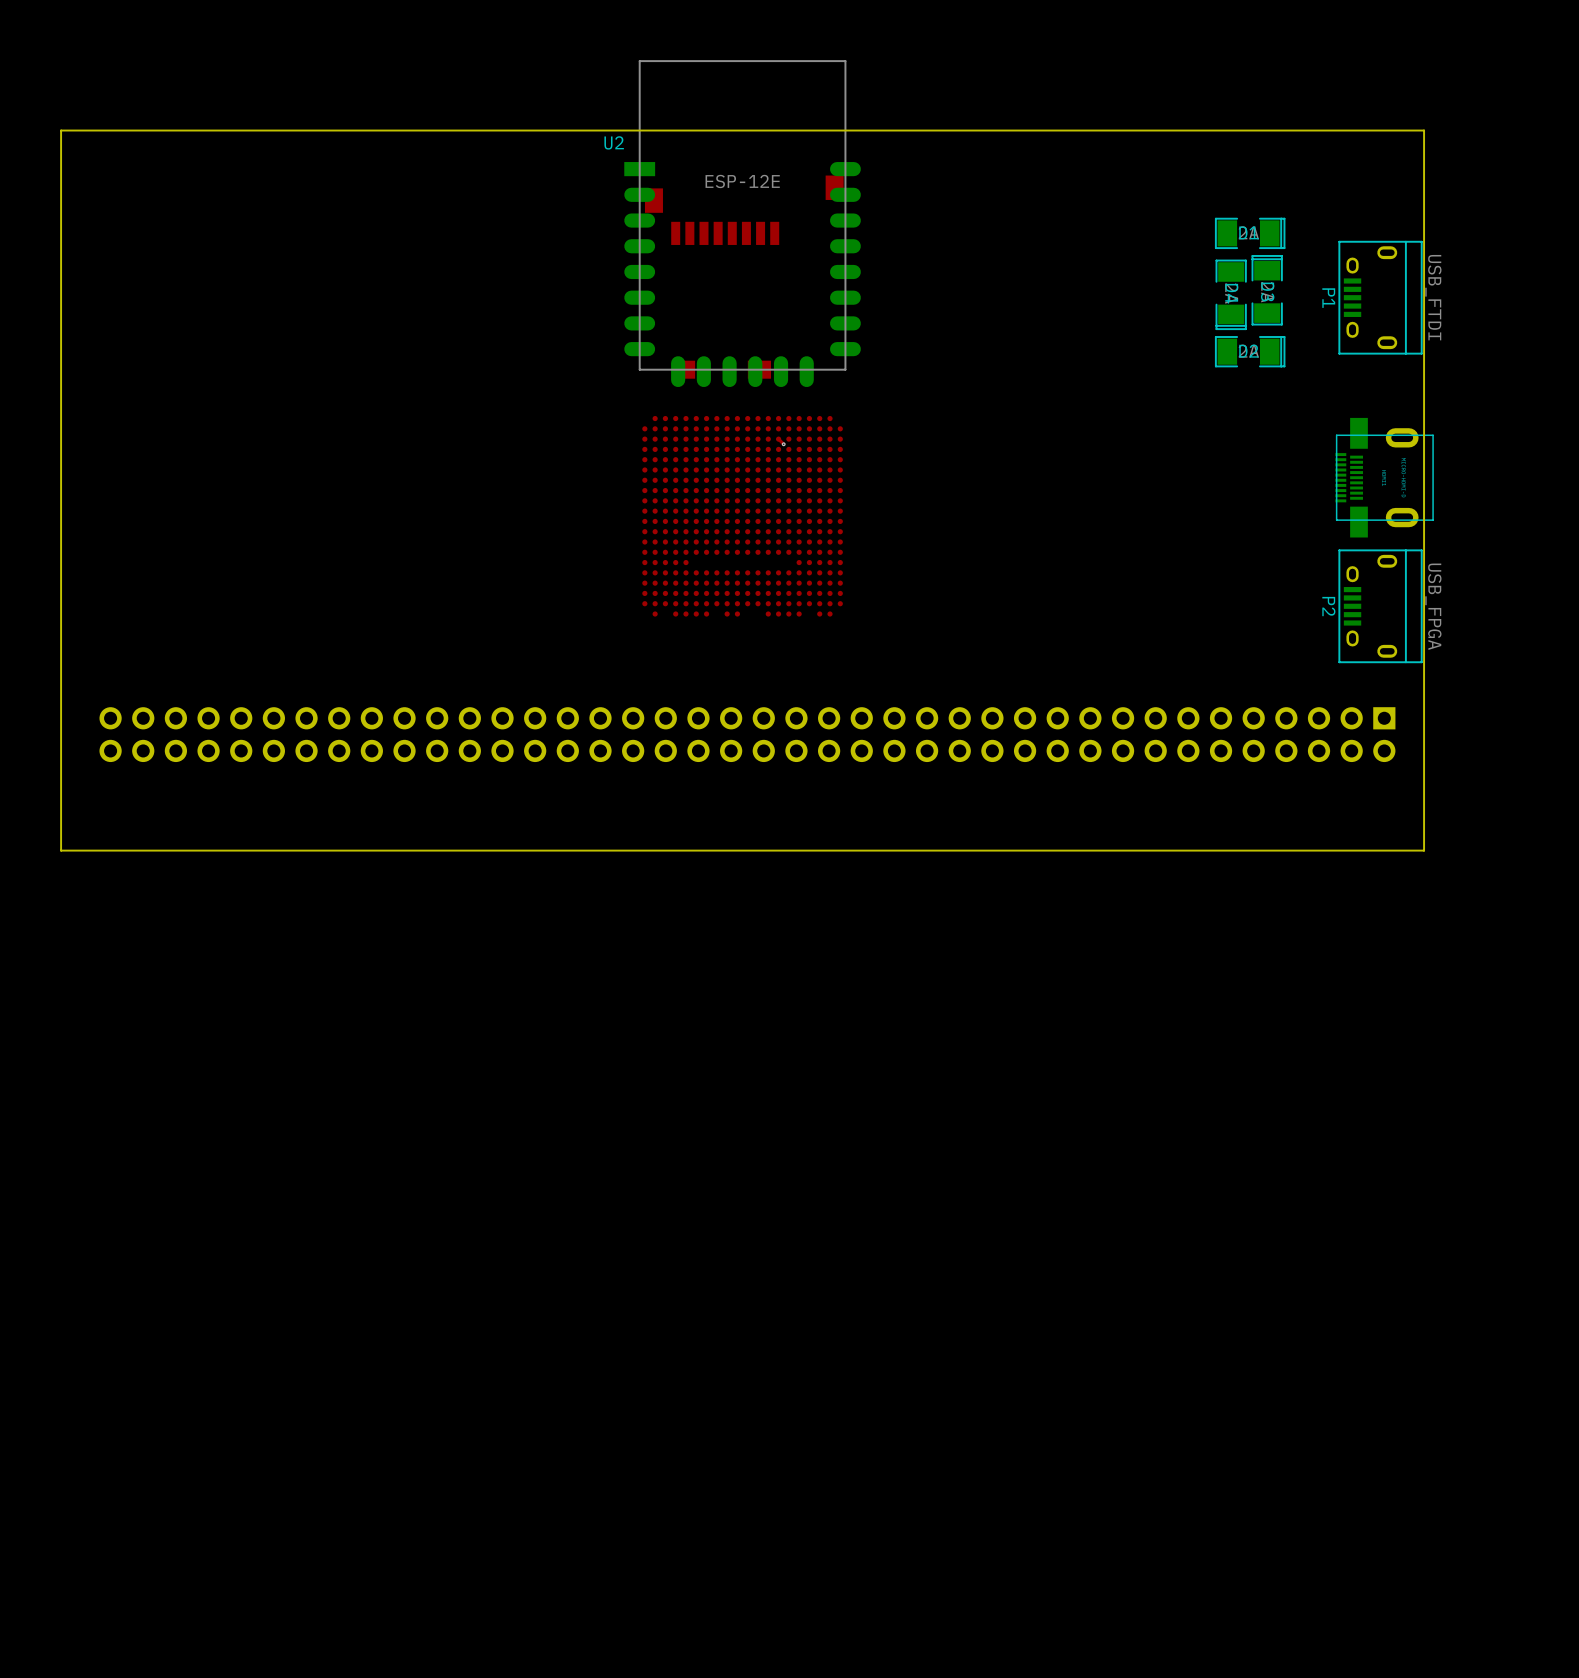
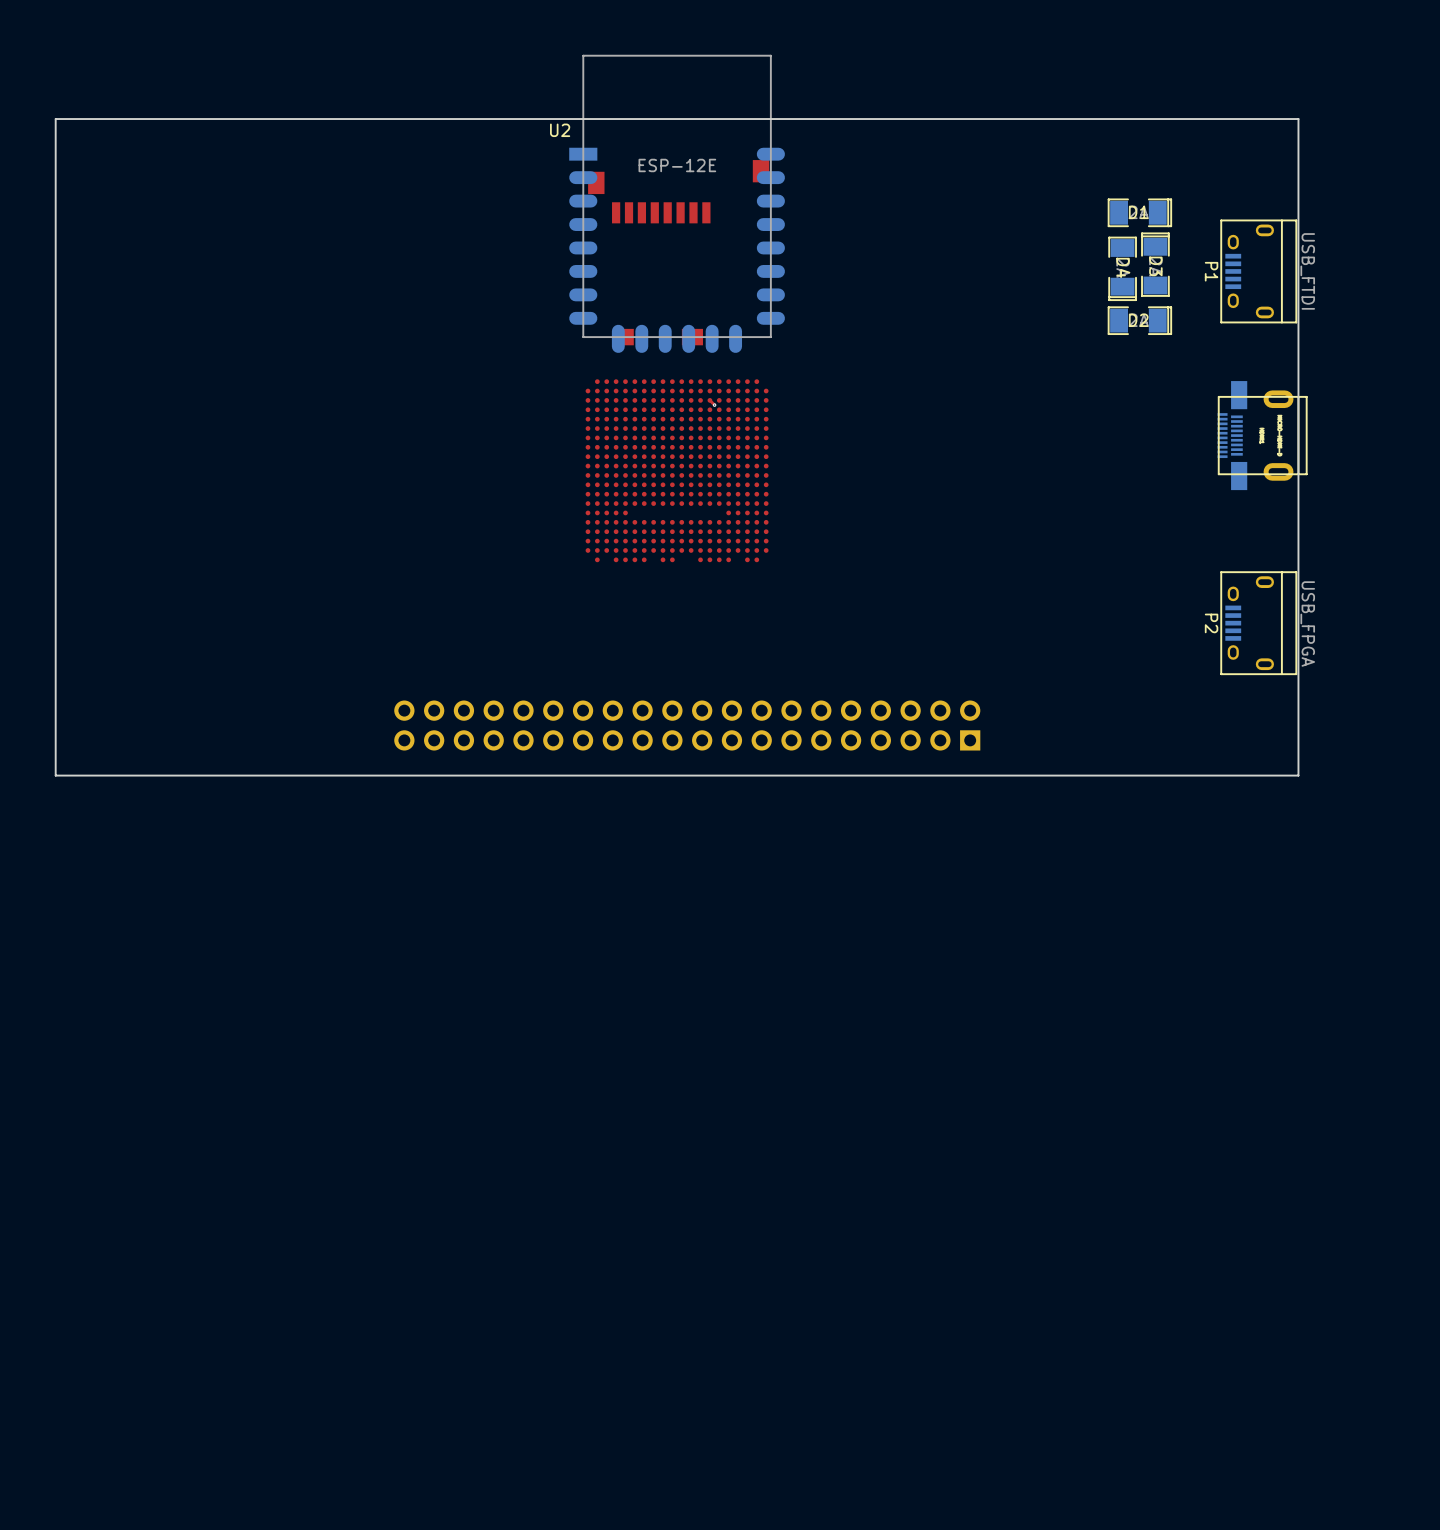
P2 position: (1380, 606) -> (1258, 623)
part: (747, 734) -> none
part: none -> (687, 725)

